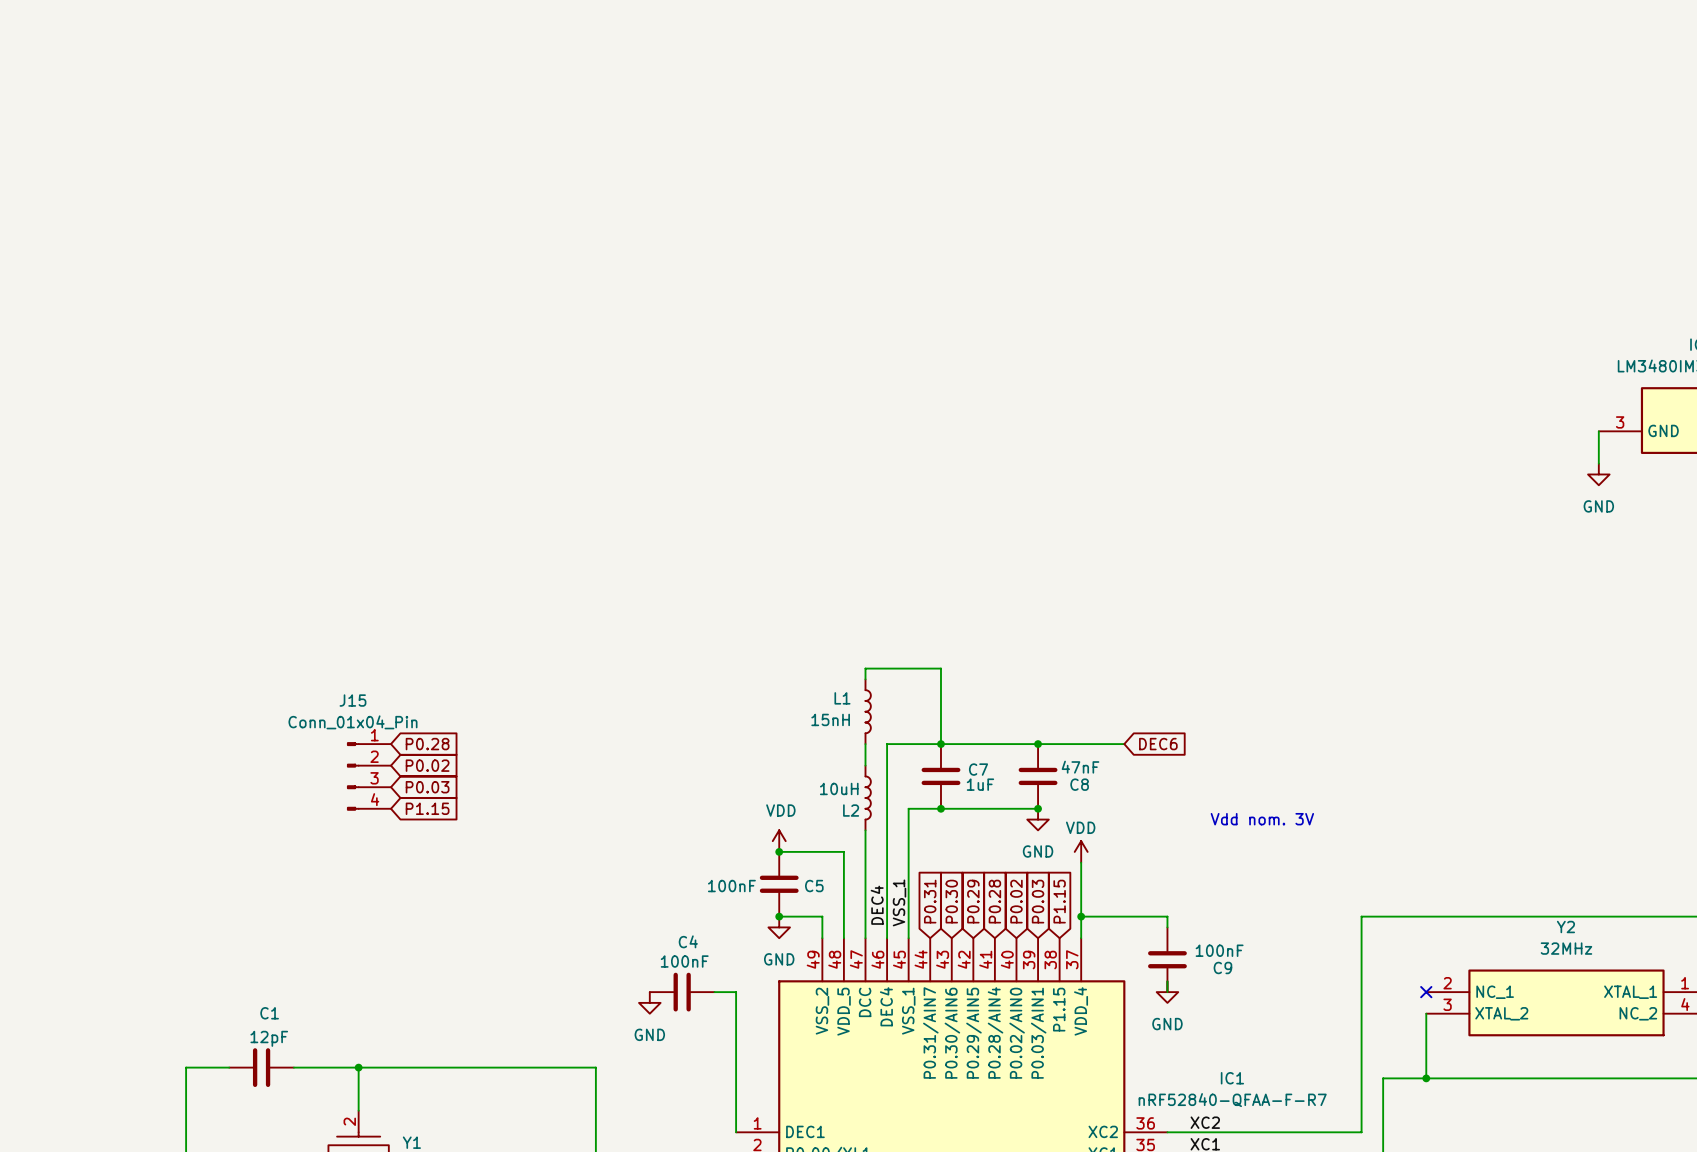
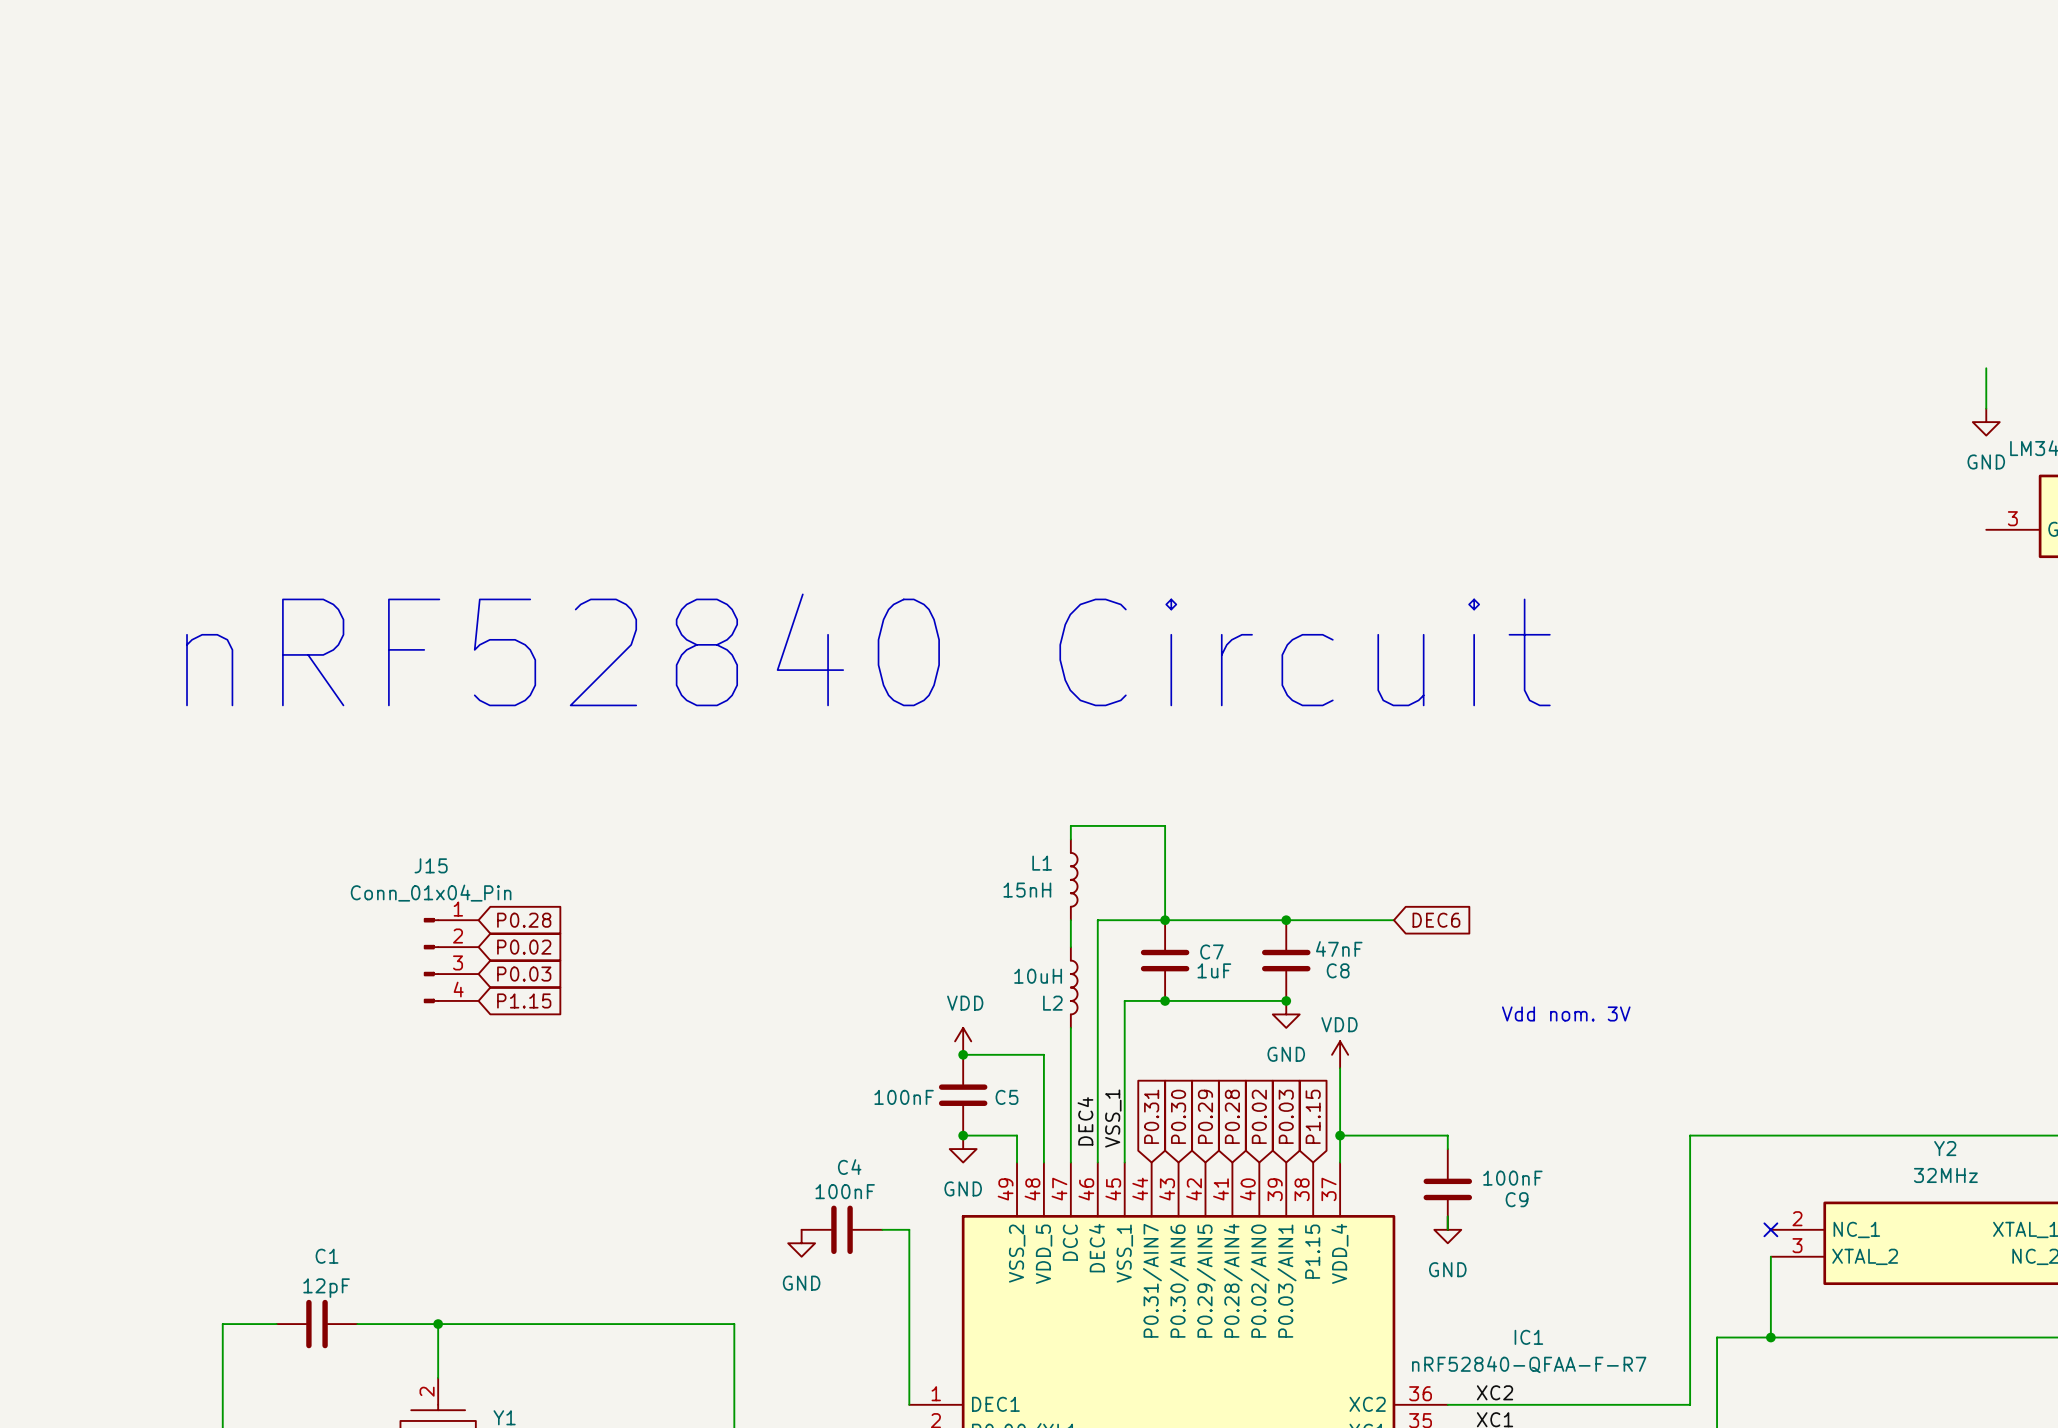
power symbol: none -> GND (1986, 422)
wire: (1598, 431) (1598, 463) -> (1986, 368) (1986, 408)
power symbol: GND (1598, 474) -> none
text: none -> nRF52840 Circuit (868, 649)

